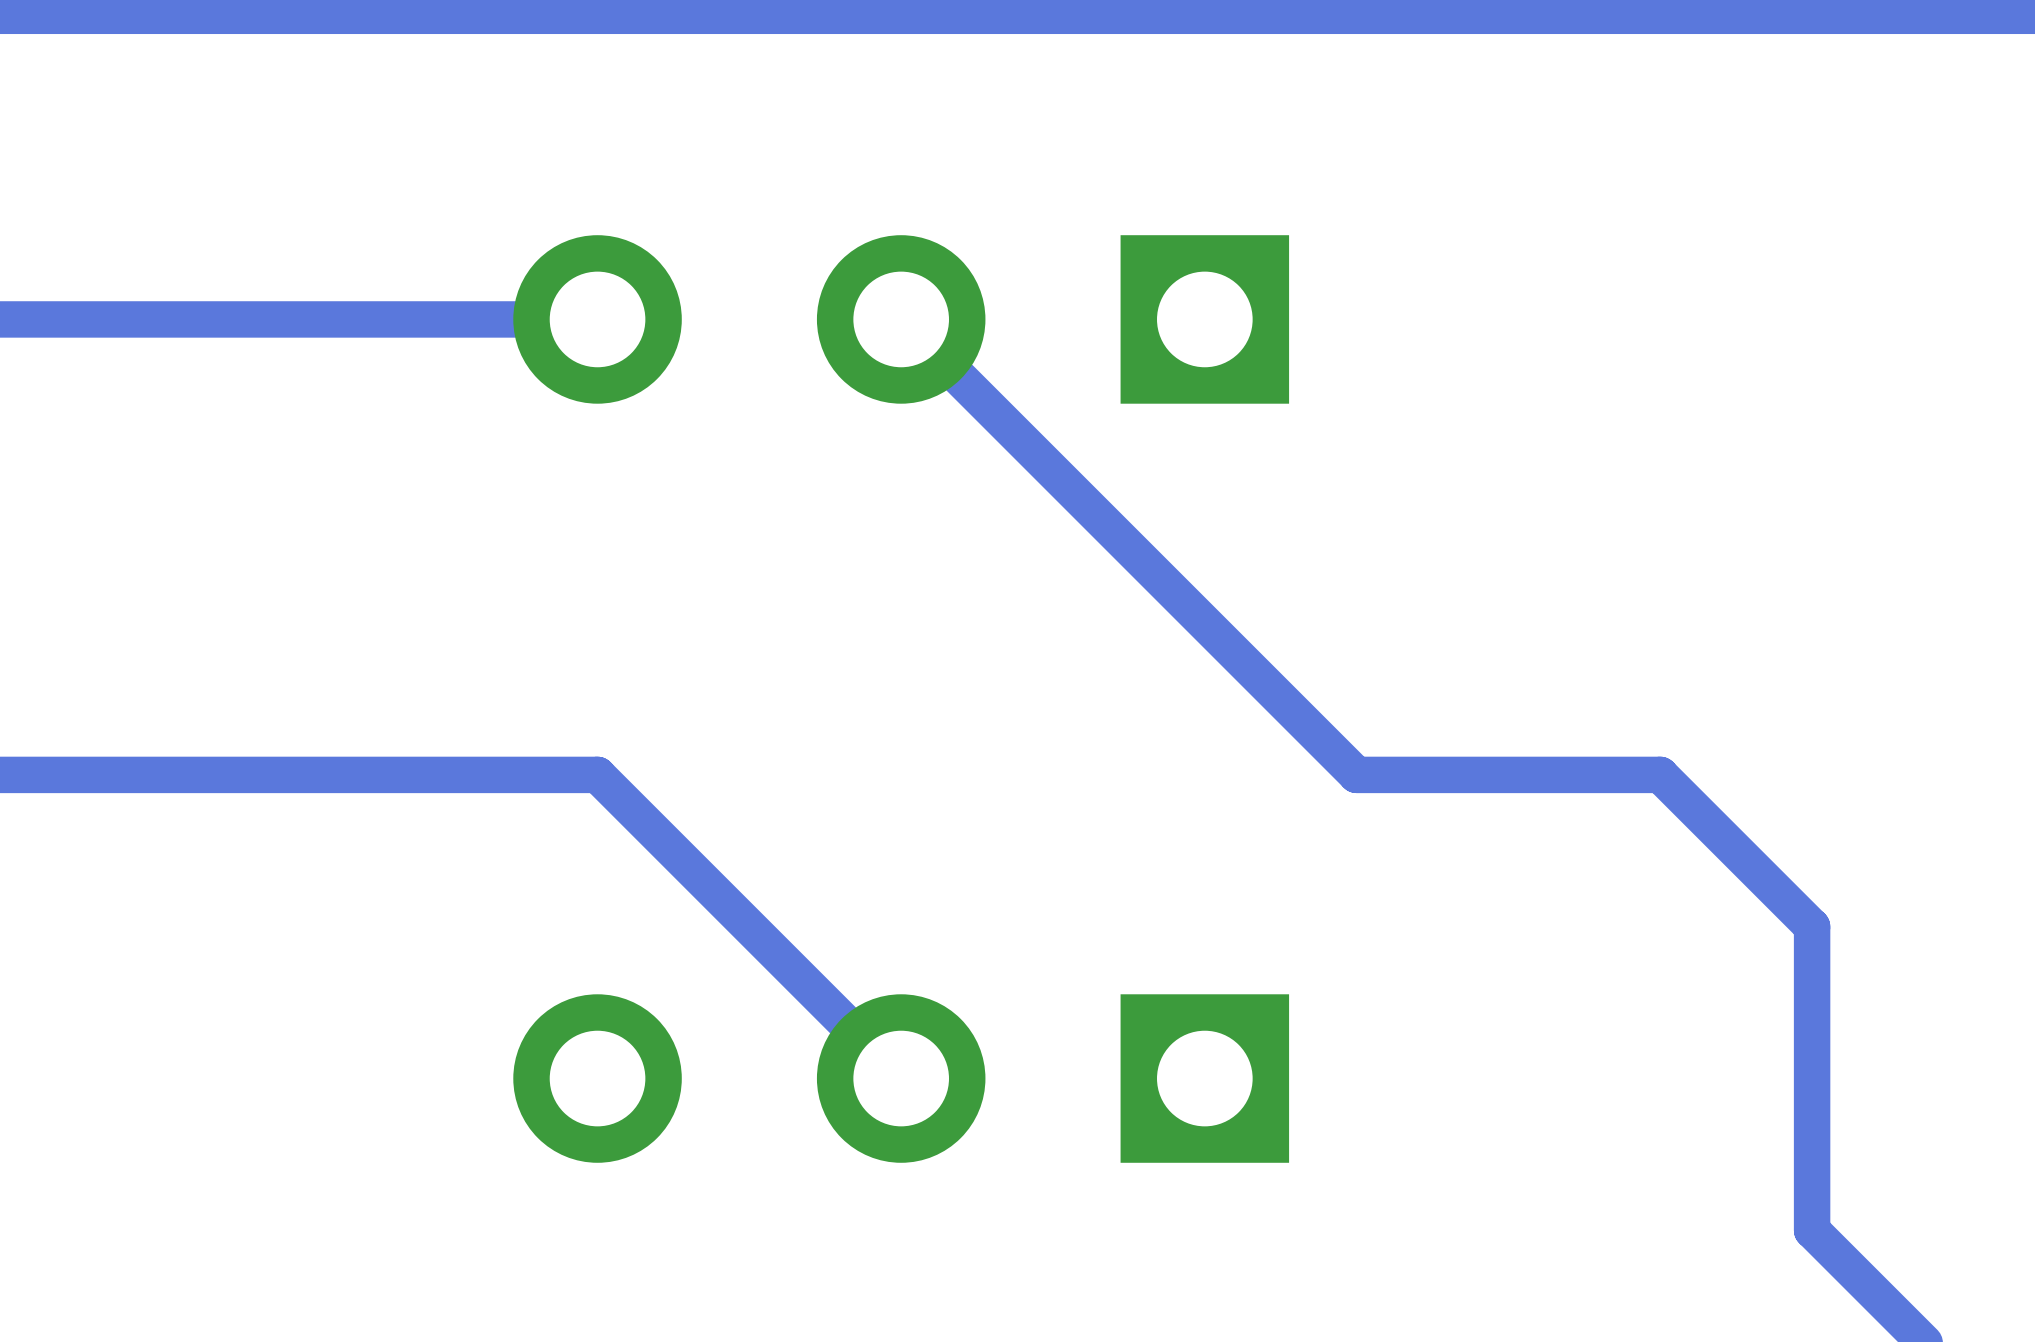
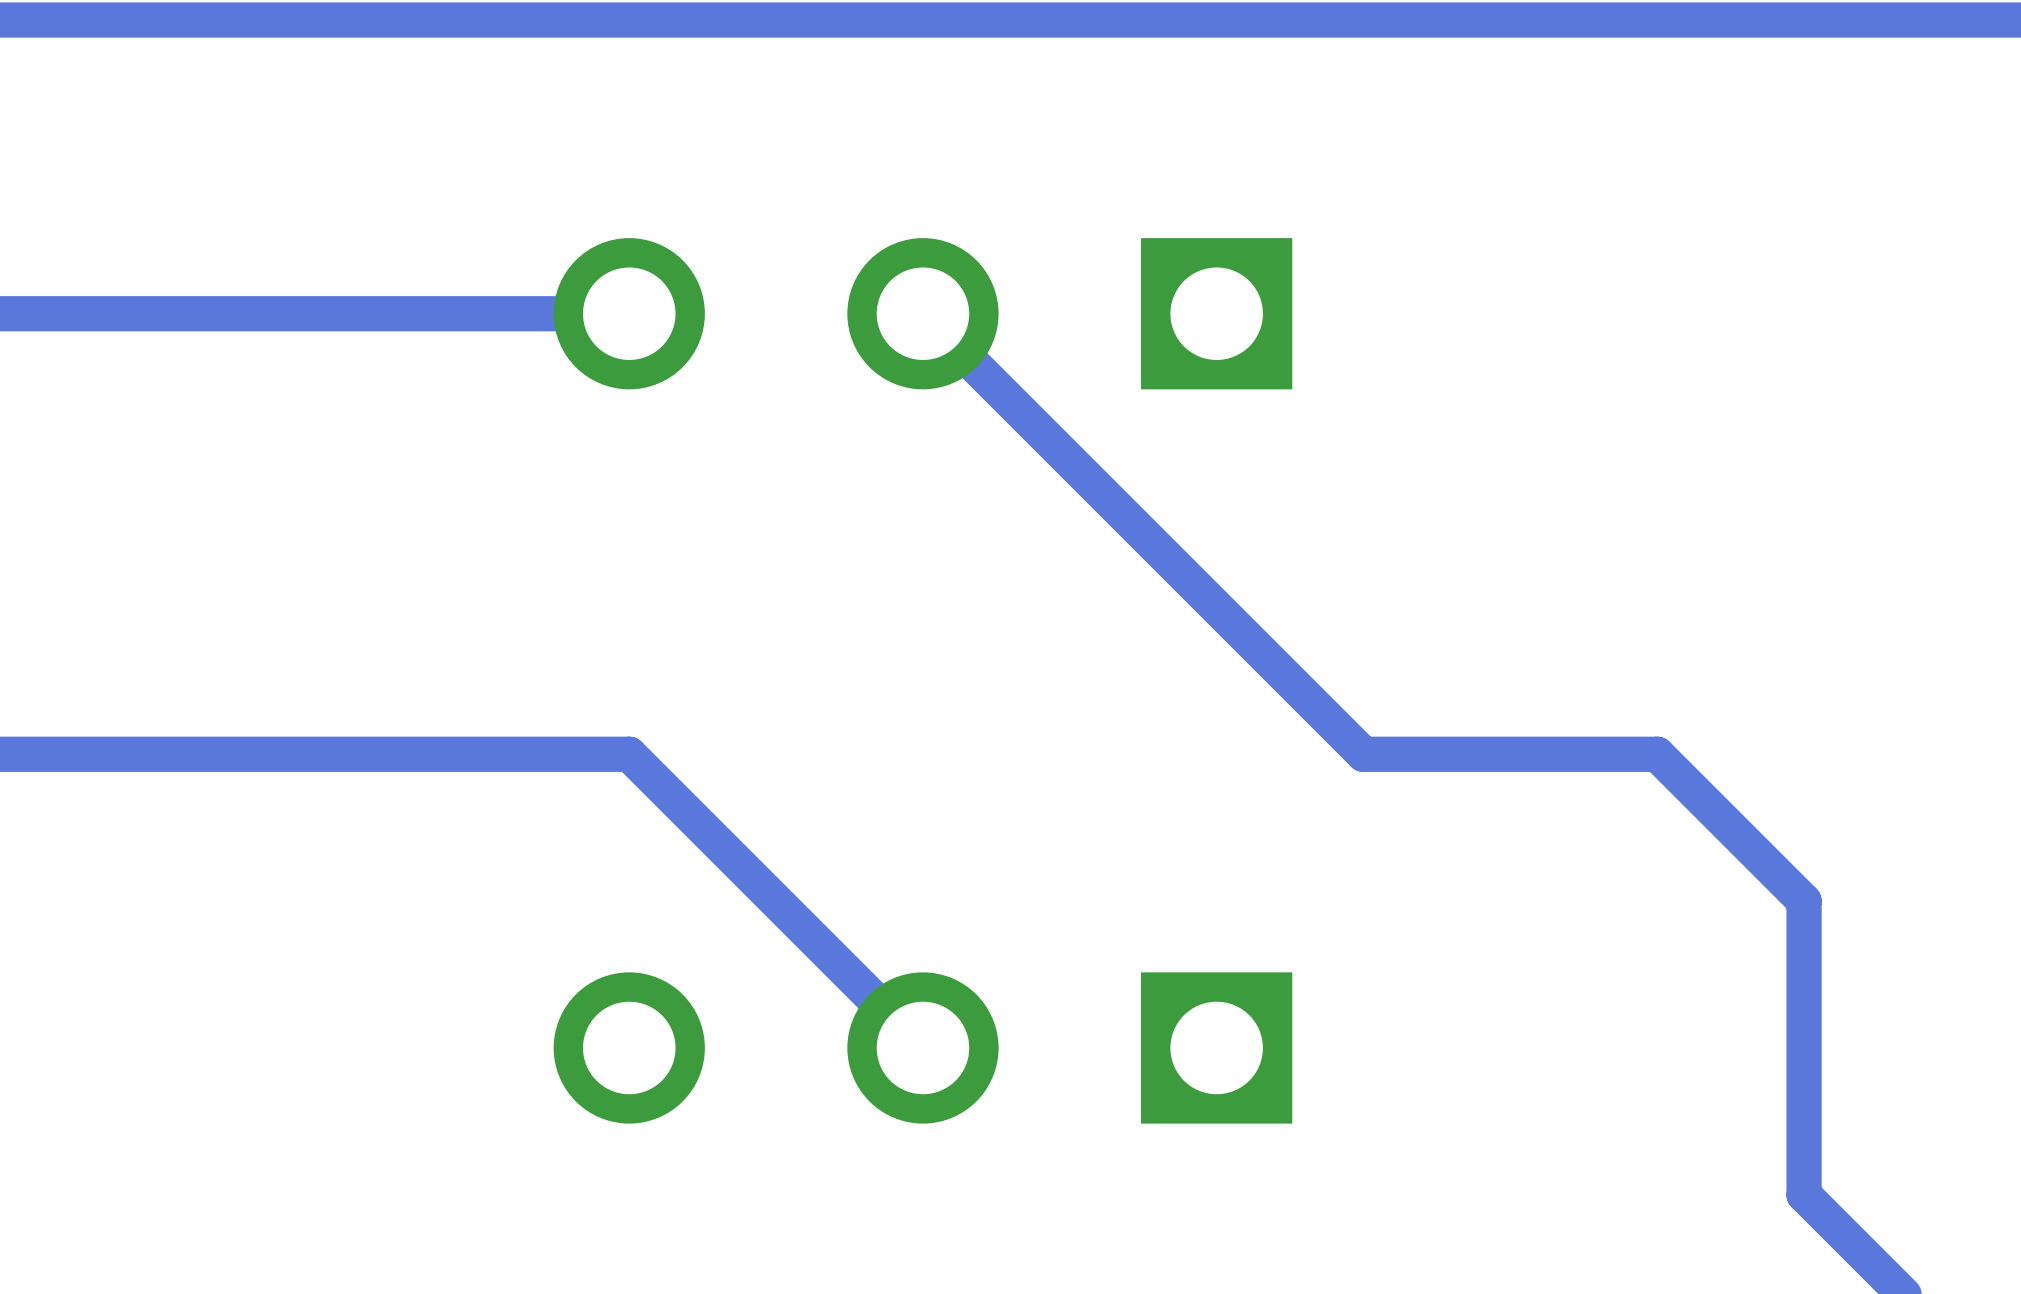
part footprint: [513, 235, 1290, 404] -> [553, 238, 1293, 390]
part footprint: [513, 994, 1290, 1163] -> [553, 972, 1293, 1124]

